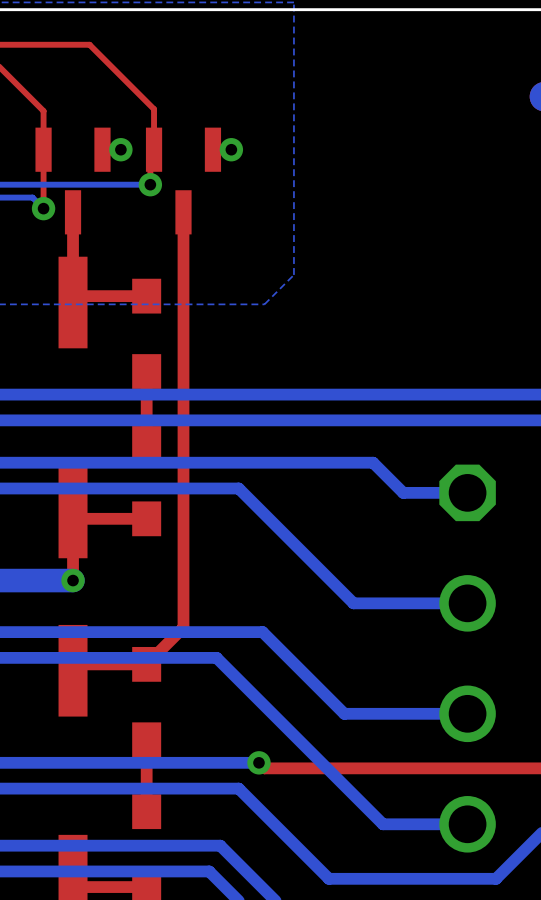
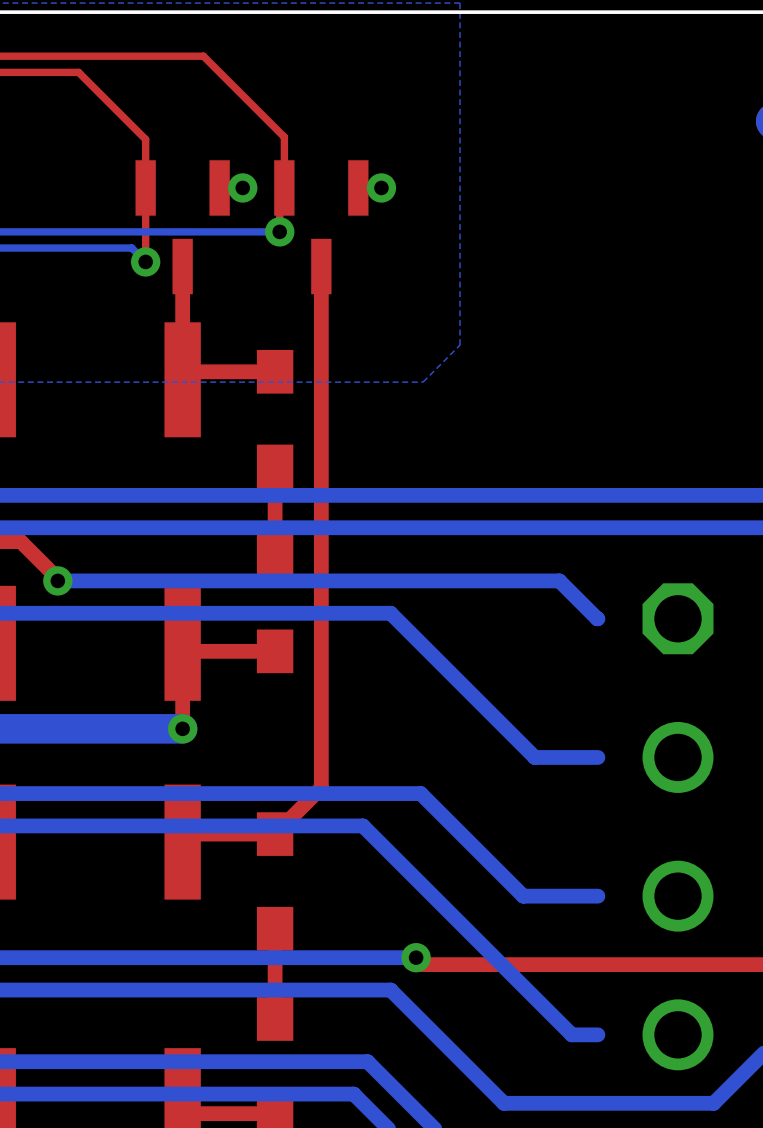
bottom track: (467, 492) (403, 492) -> none
bottom track: (467, 603) (403, 603) -> none
bottom track: (467, 713) (403, 713) -> none
bottom track: (467, 824) (403, 824) -> none

